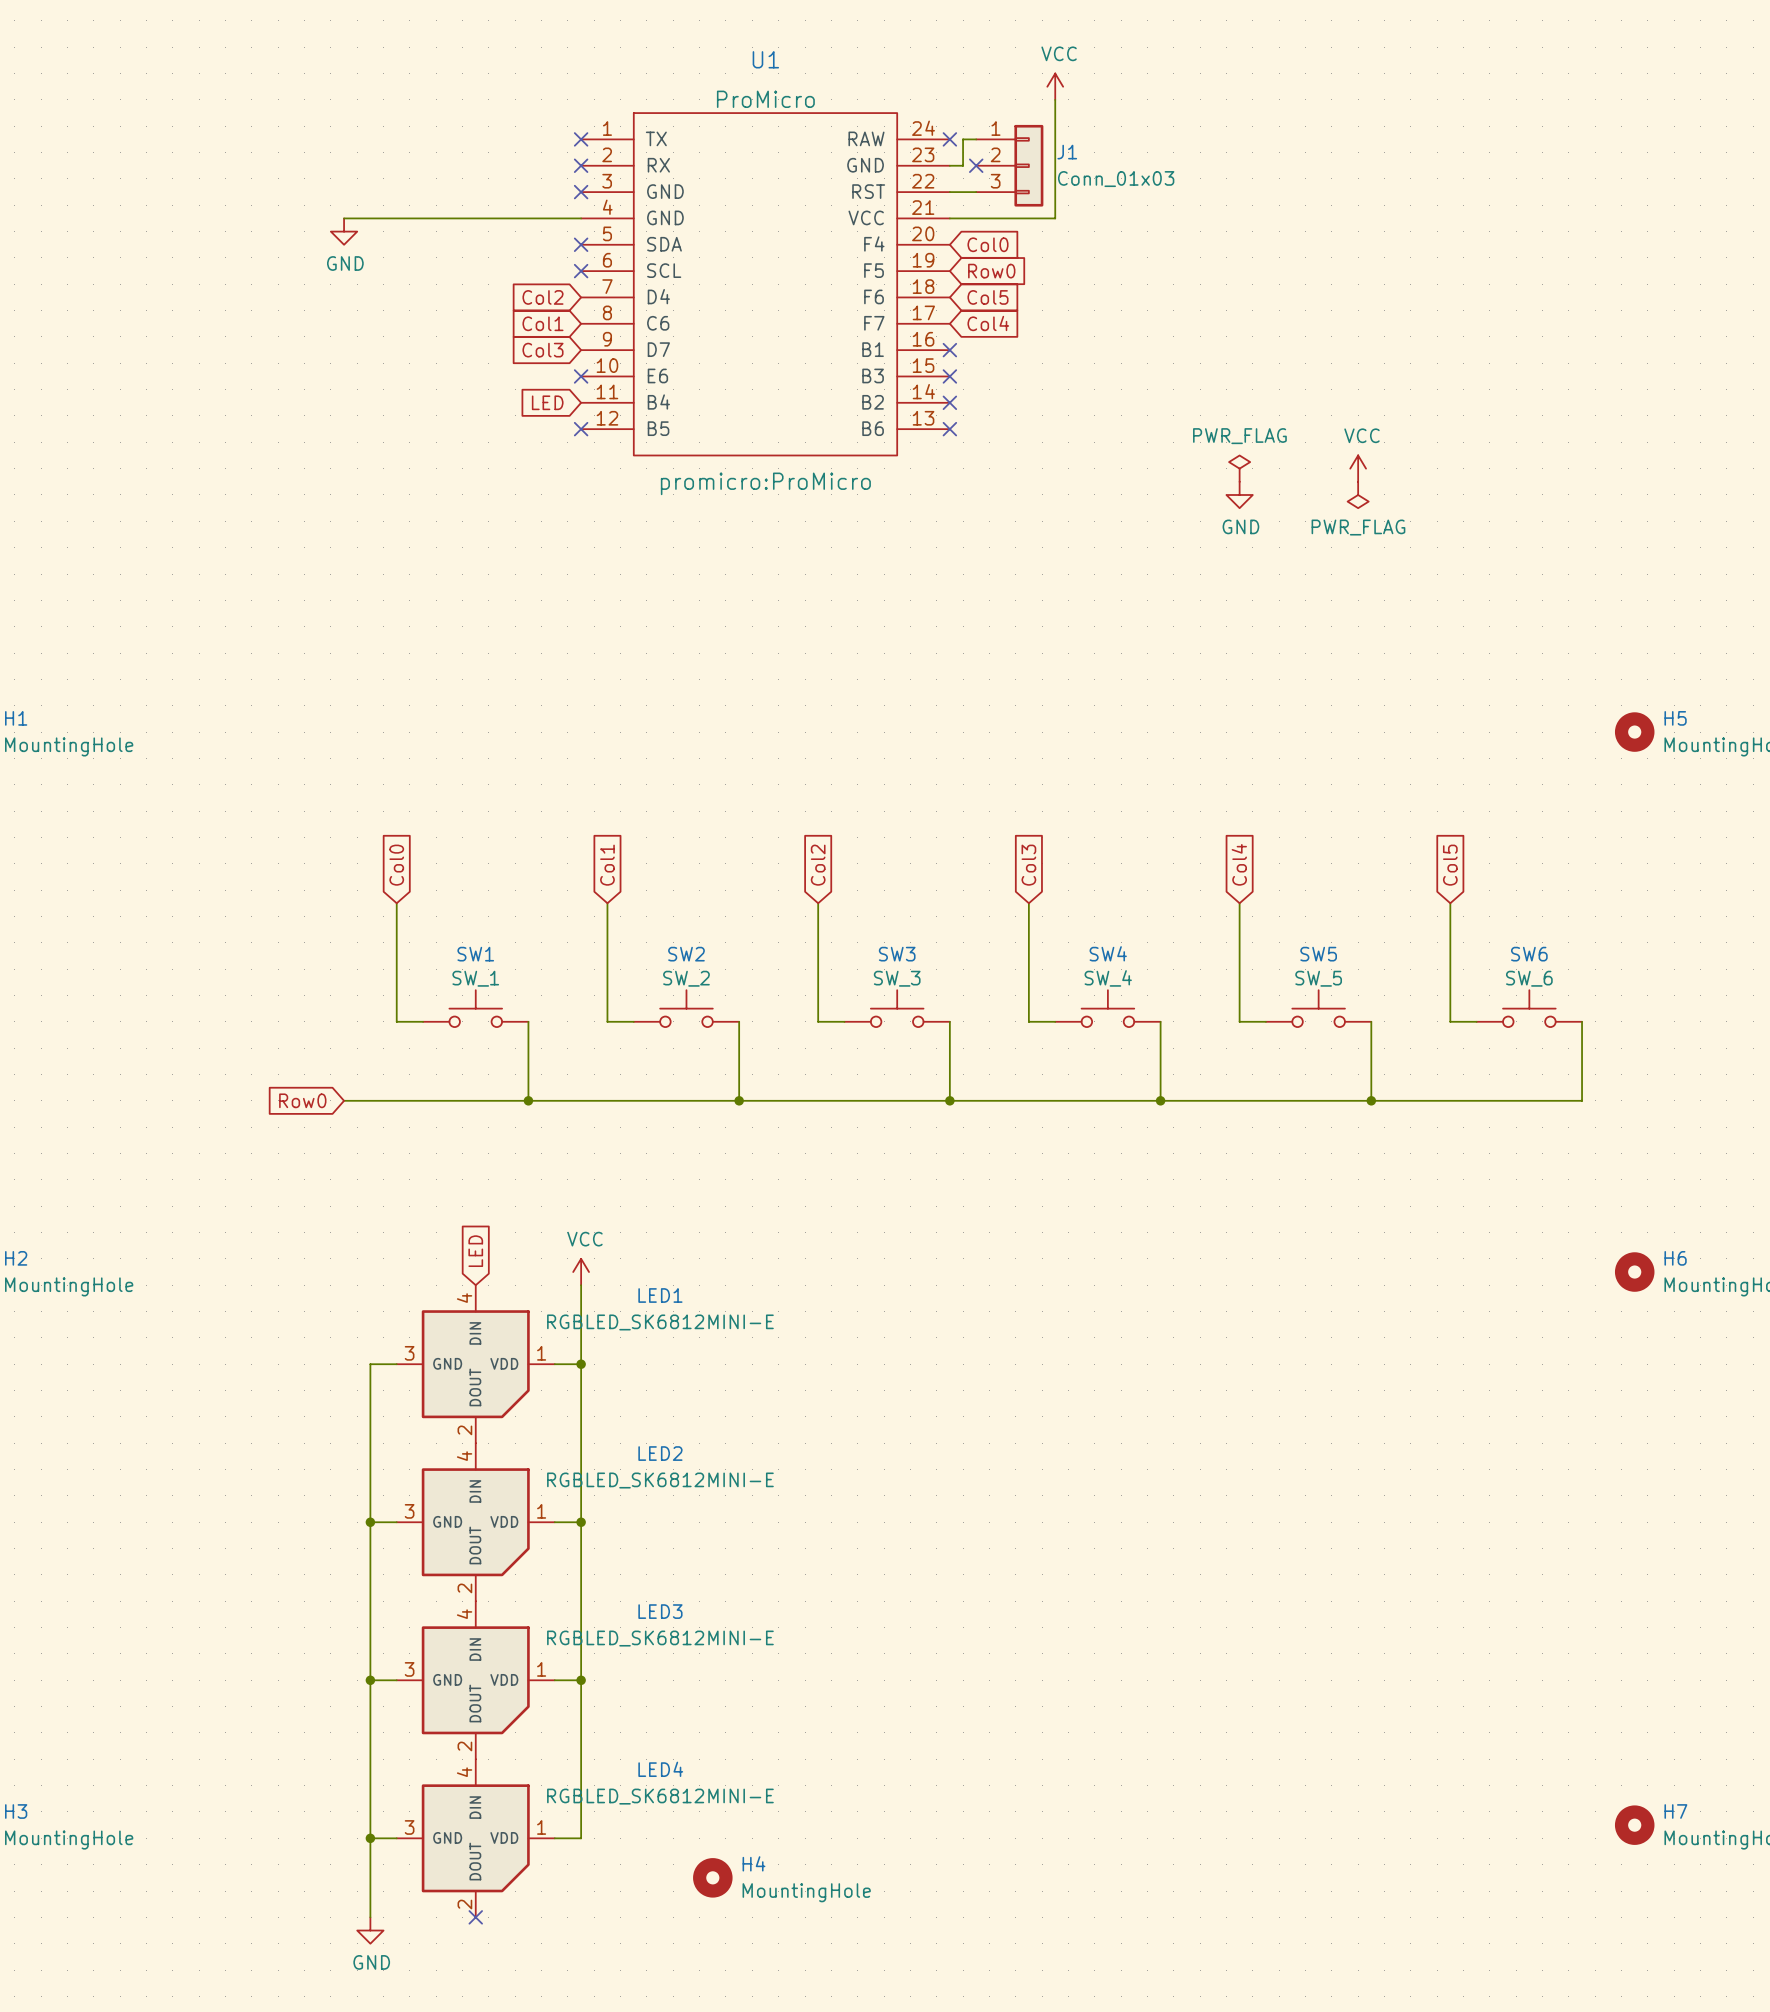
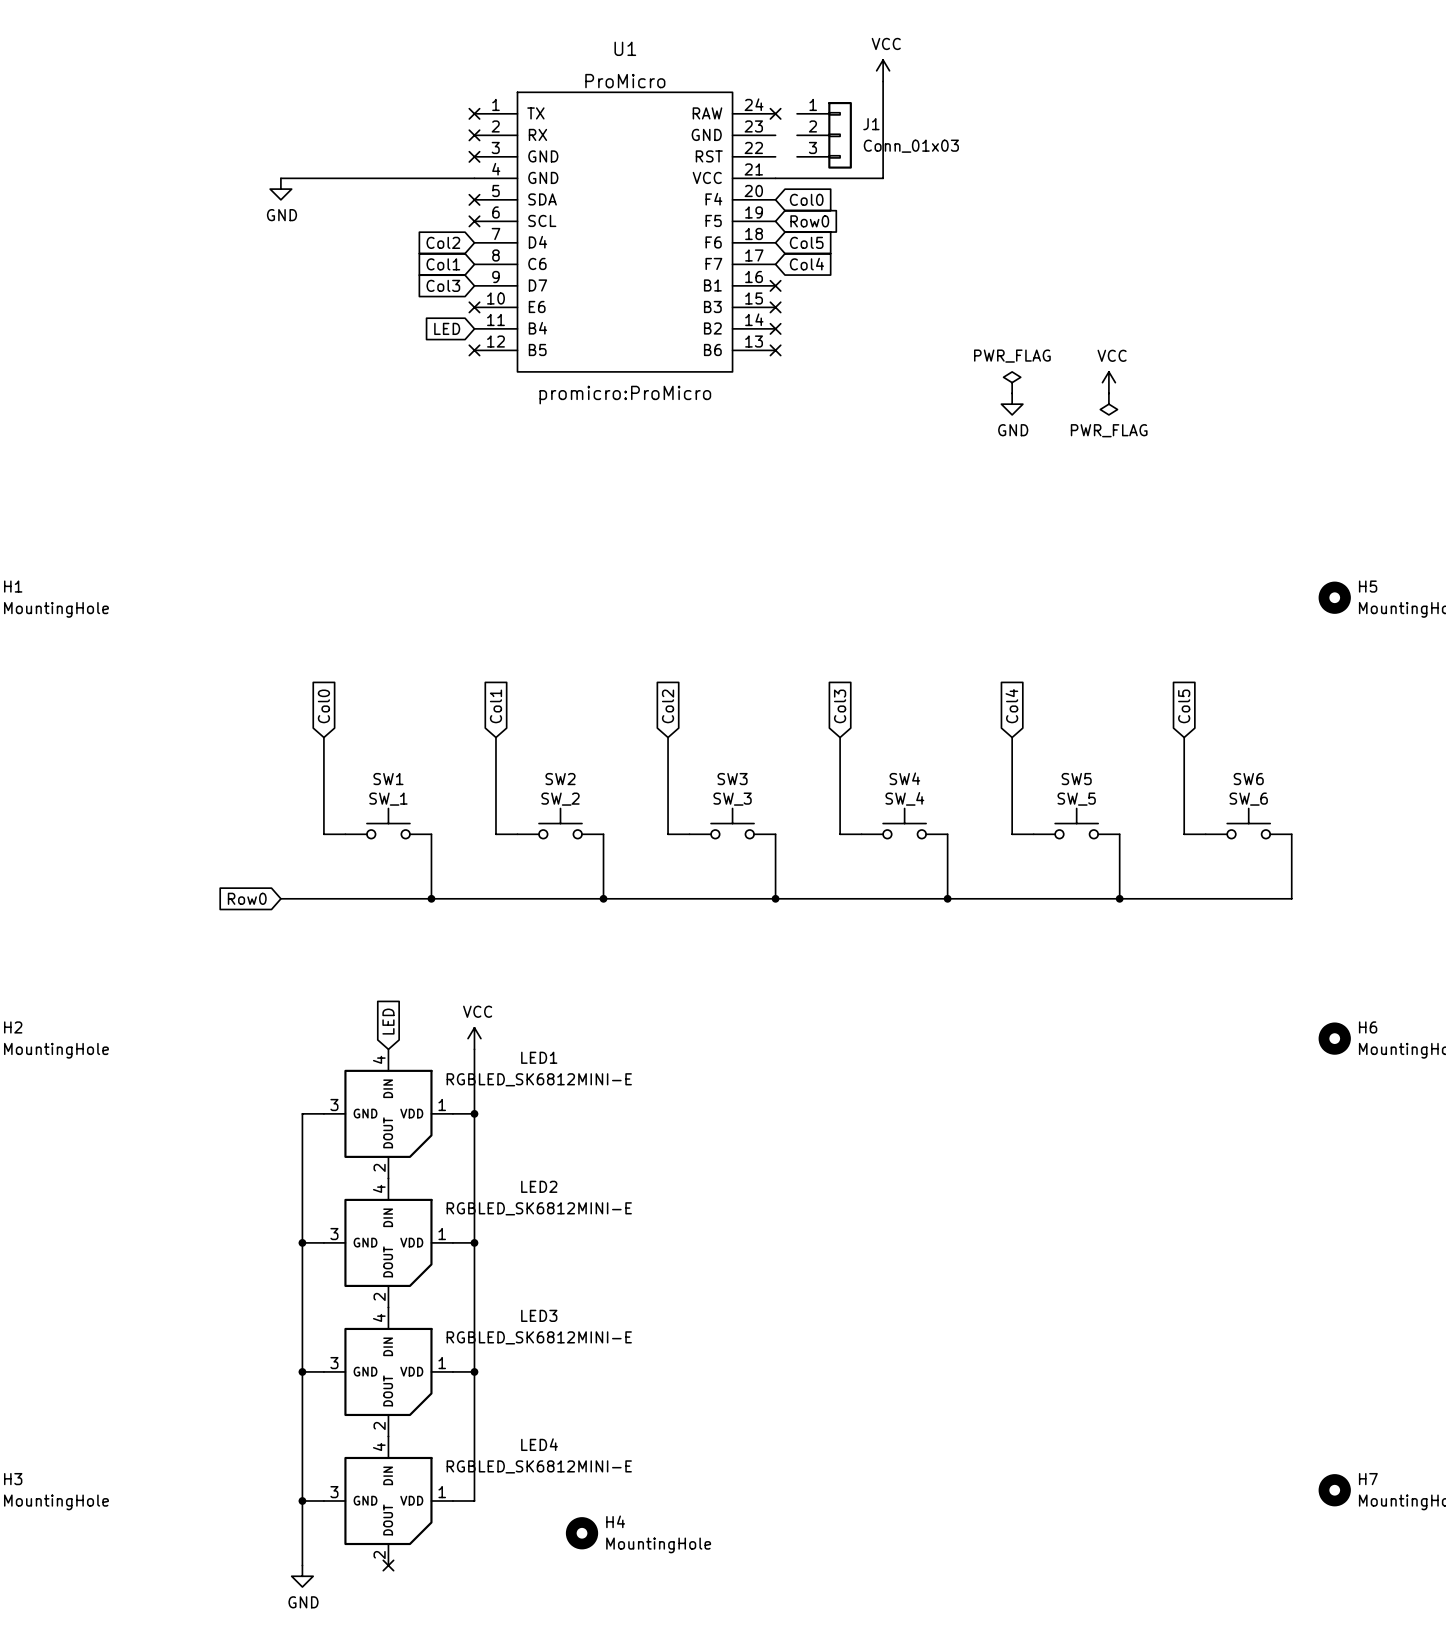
power symbol position: VCC (1055, 86) -> VCC (883, 70)
wire: (1055, 99) (1055, 218) -> (883, 81) (883, 178) (861, 178)
wire: (976, 139) (963, 139) (963, 165) (949, 165) -> none
no-connect mark: (976, 165) -> none
wire: (949, 192) (976, 192) -> none

